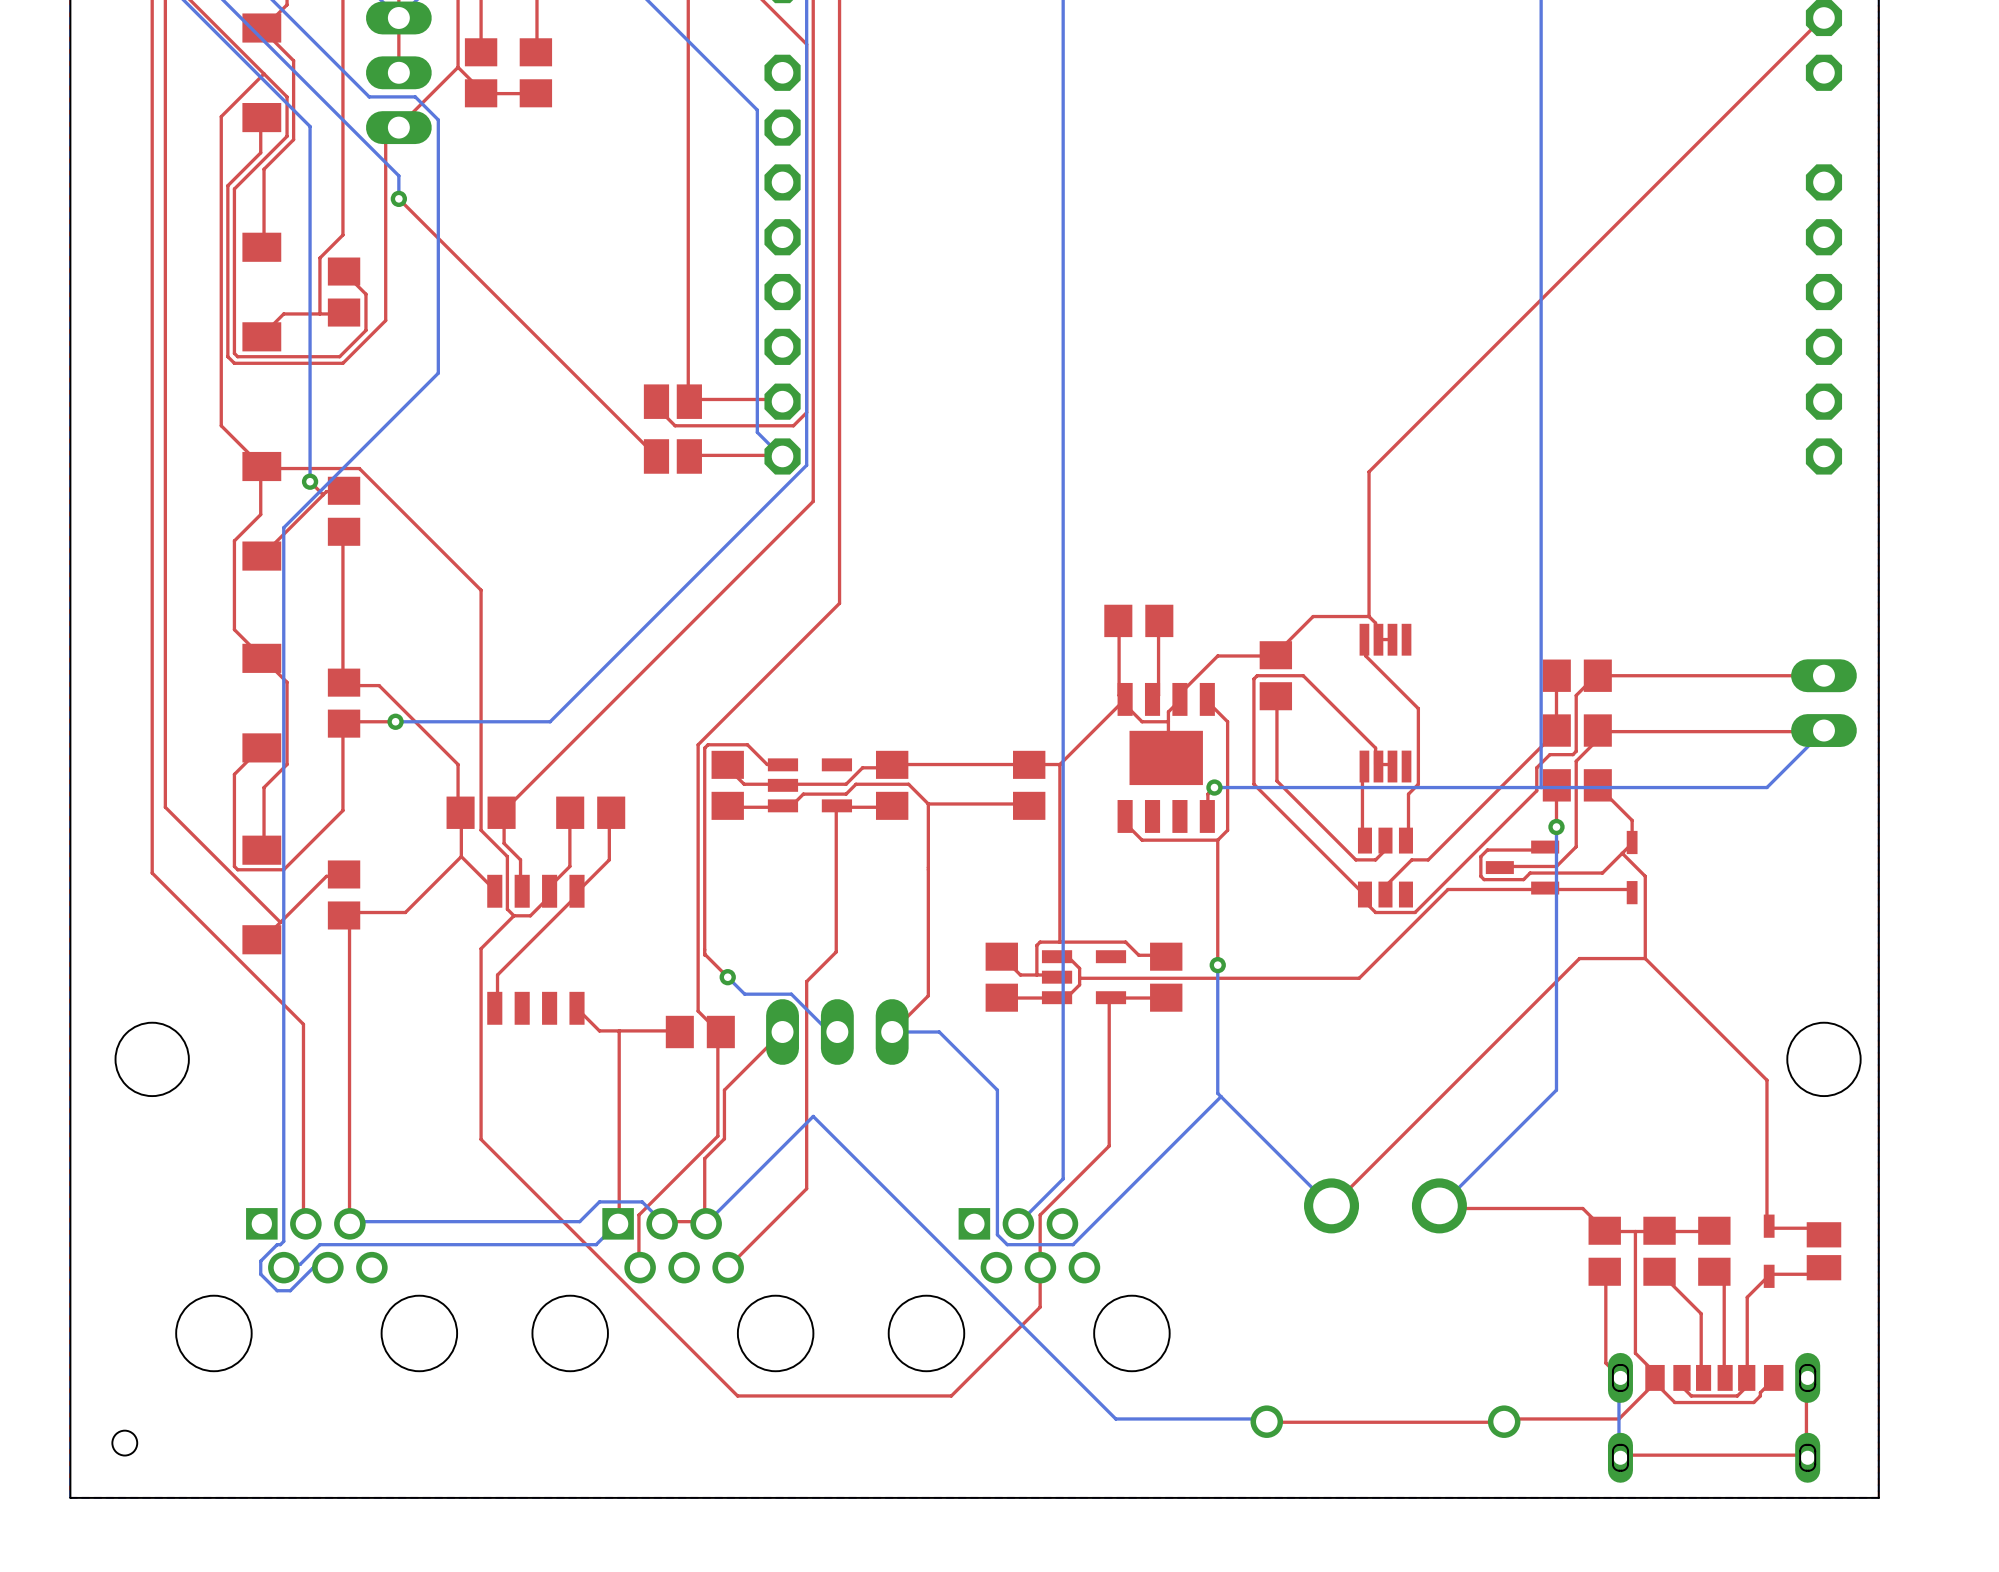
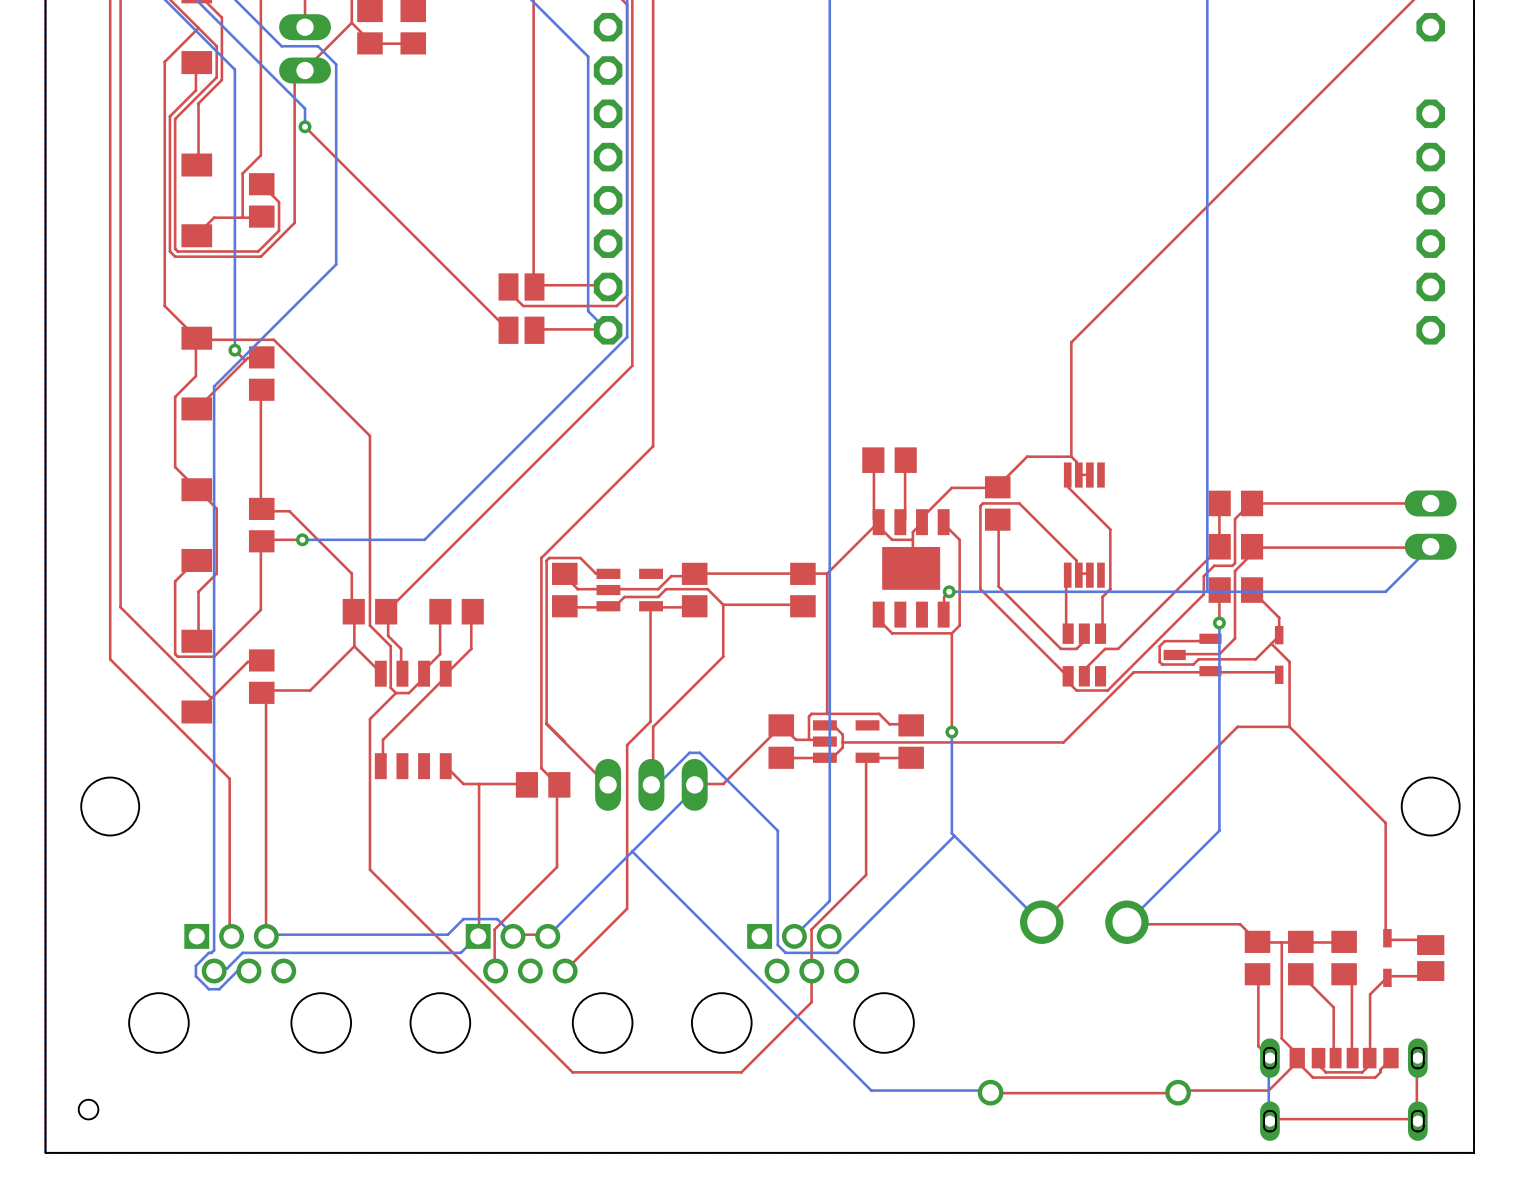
top track: (928, 869) (928, 995) (892, 1032) -> (723, 656) (653, 726) (653, 784) (651, 784)
top track: none -> (780, 726) (723, 784) (694, 784)
bottom track: (727, 977) (744, 994) (791, 994) (829, 1032) (837, 1032) -> none
via: (727, 977) -> none
top track: (782, 1032) (724, 1090) (724, 1138) (704, 1158) (704, 1221) -> (608, 784) (546, 724)
bottom track: none -> (694, 784) (694, 789) (632, 851)
bottom track: (939, 1032) (892, 1032) -> (731, 784) (699, 752) (689, 752) (658, 784) (651, 784)

